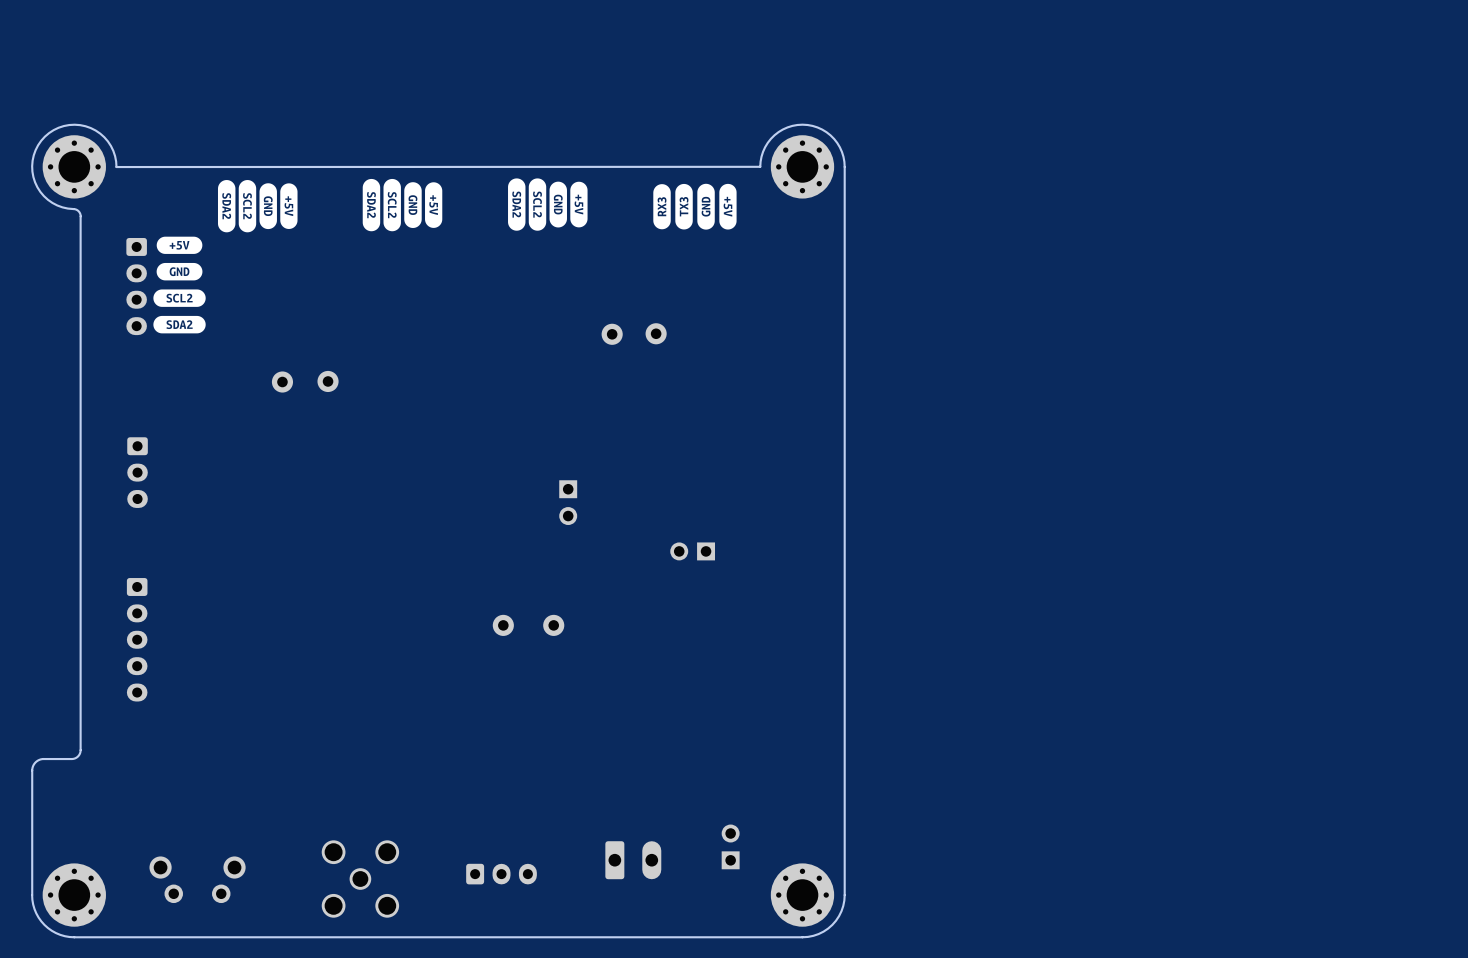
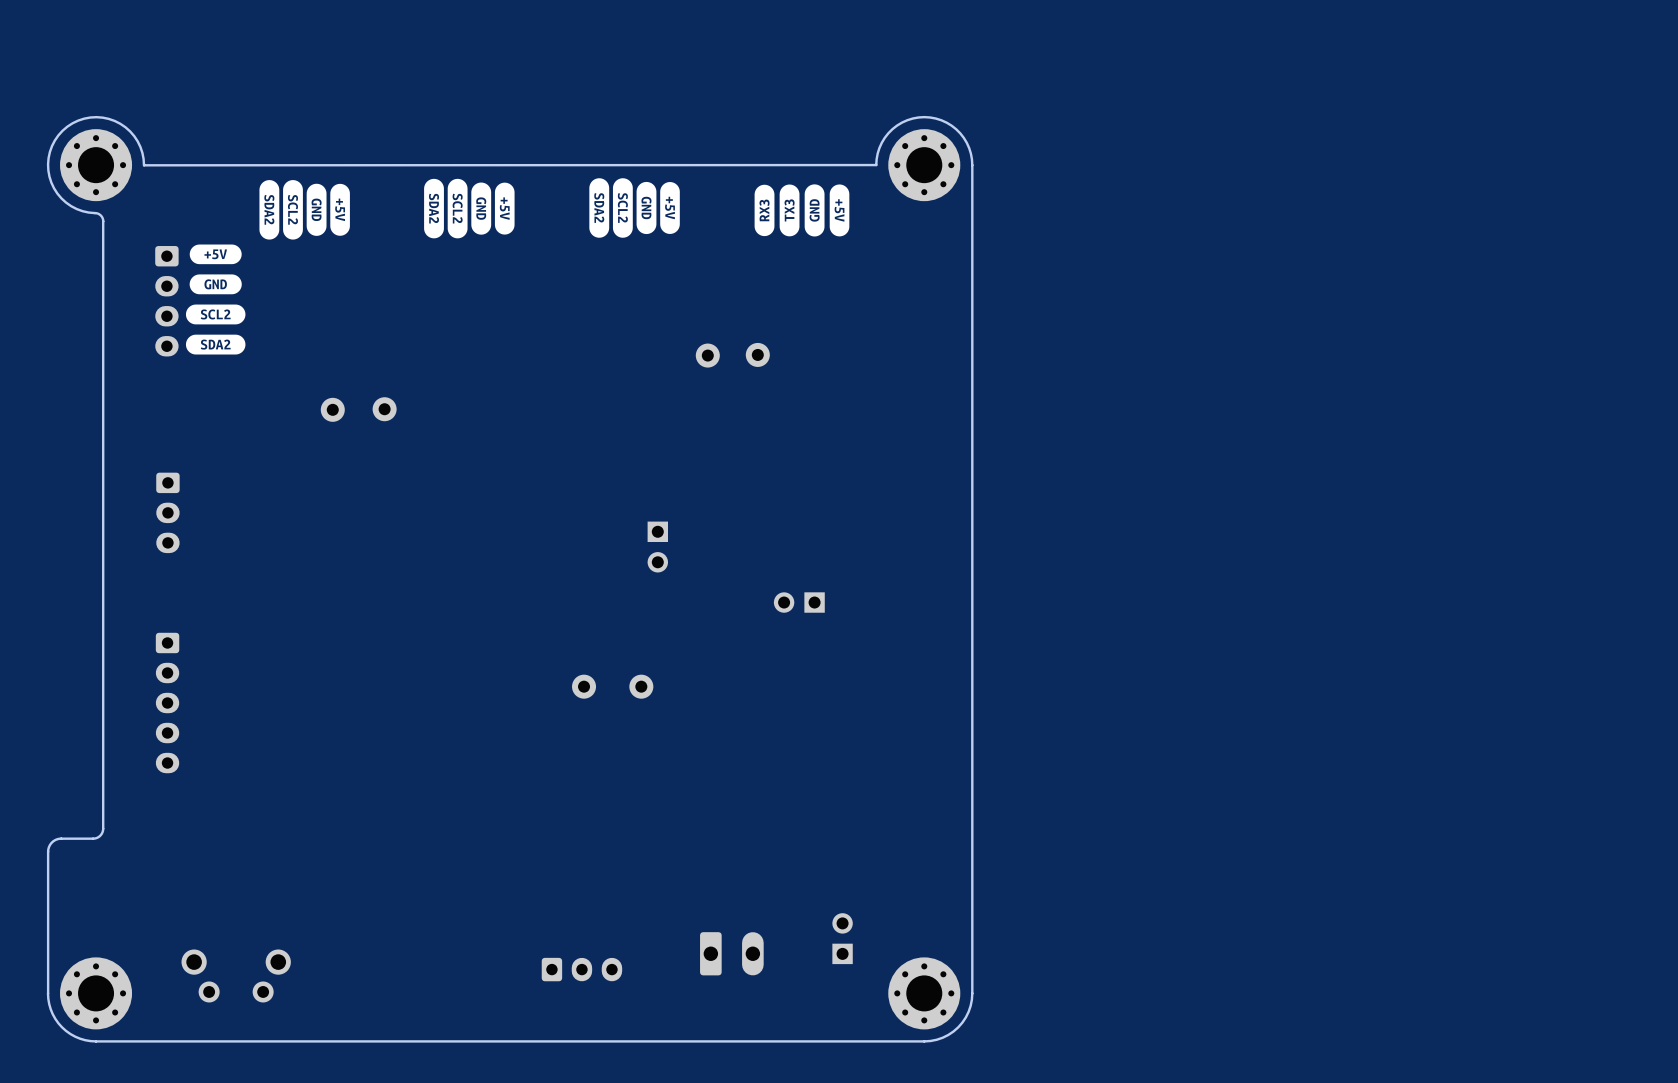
part: (360, 879) -> none

